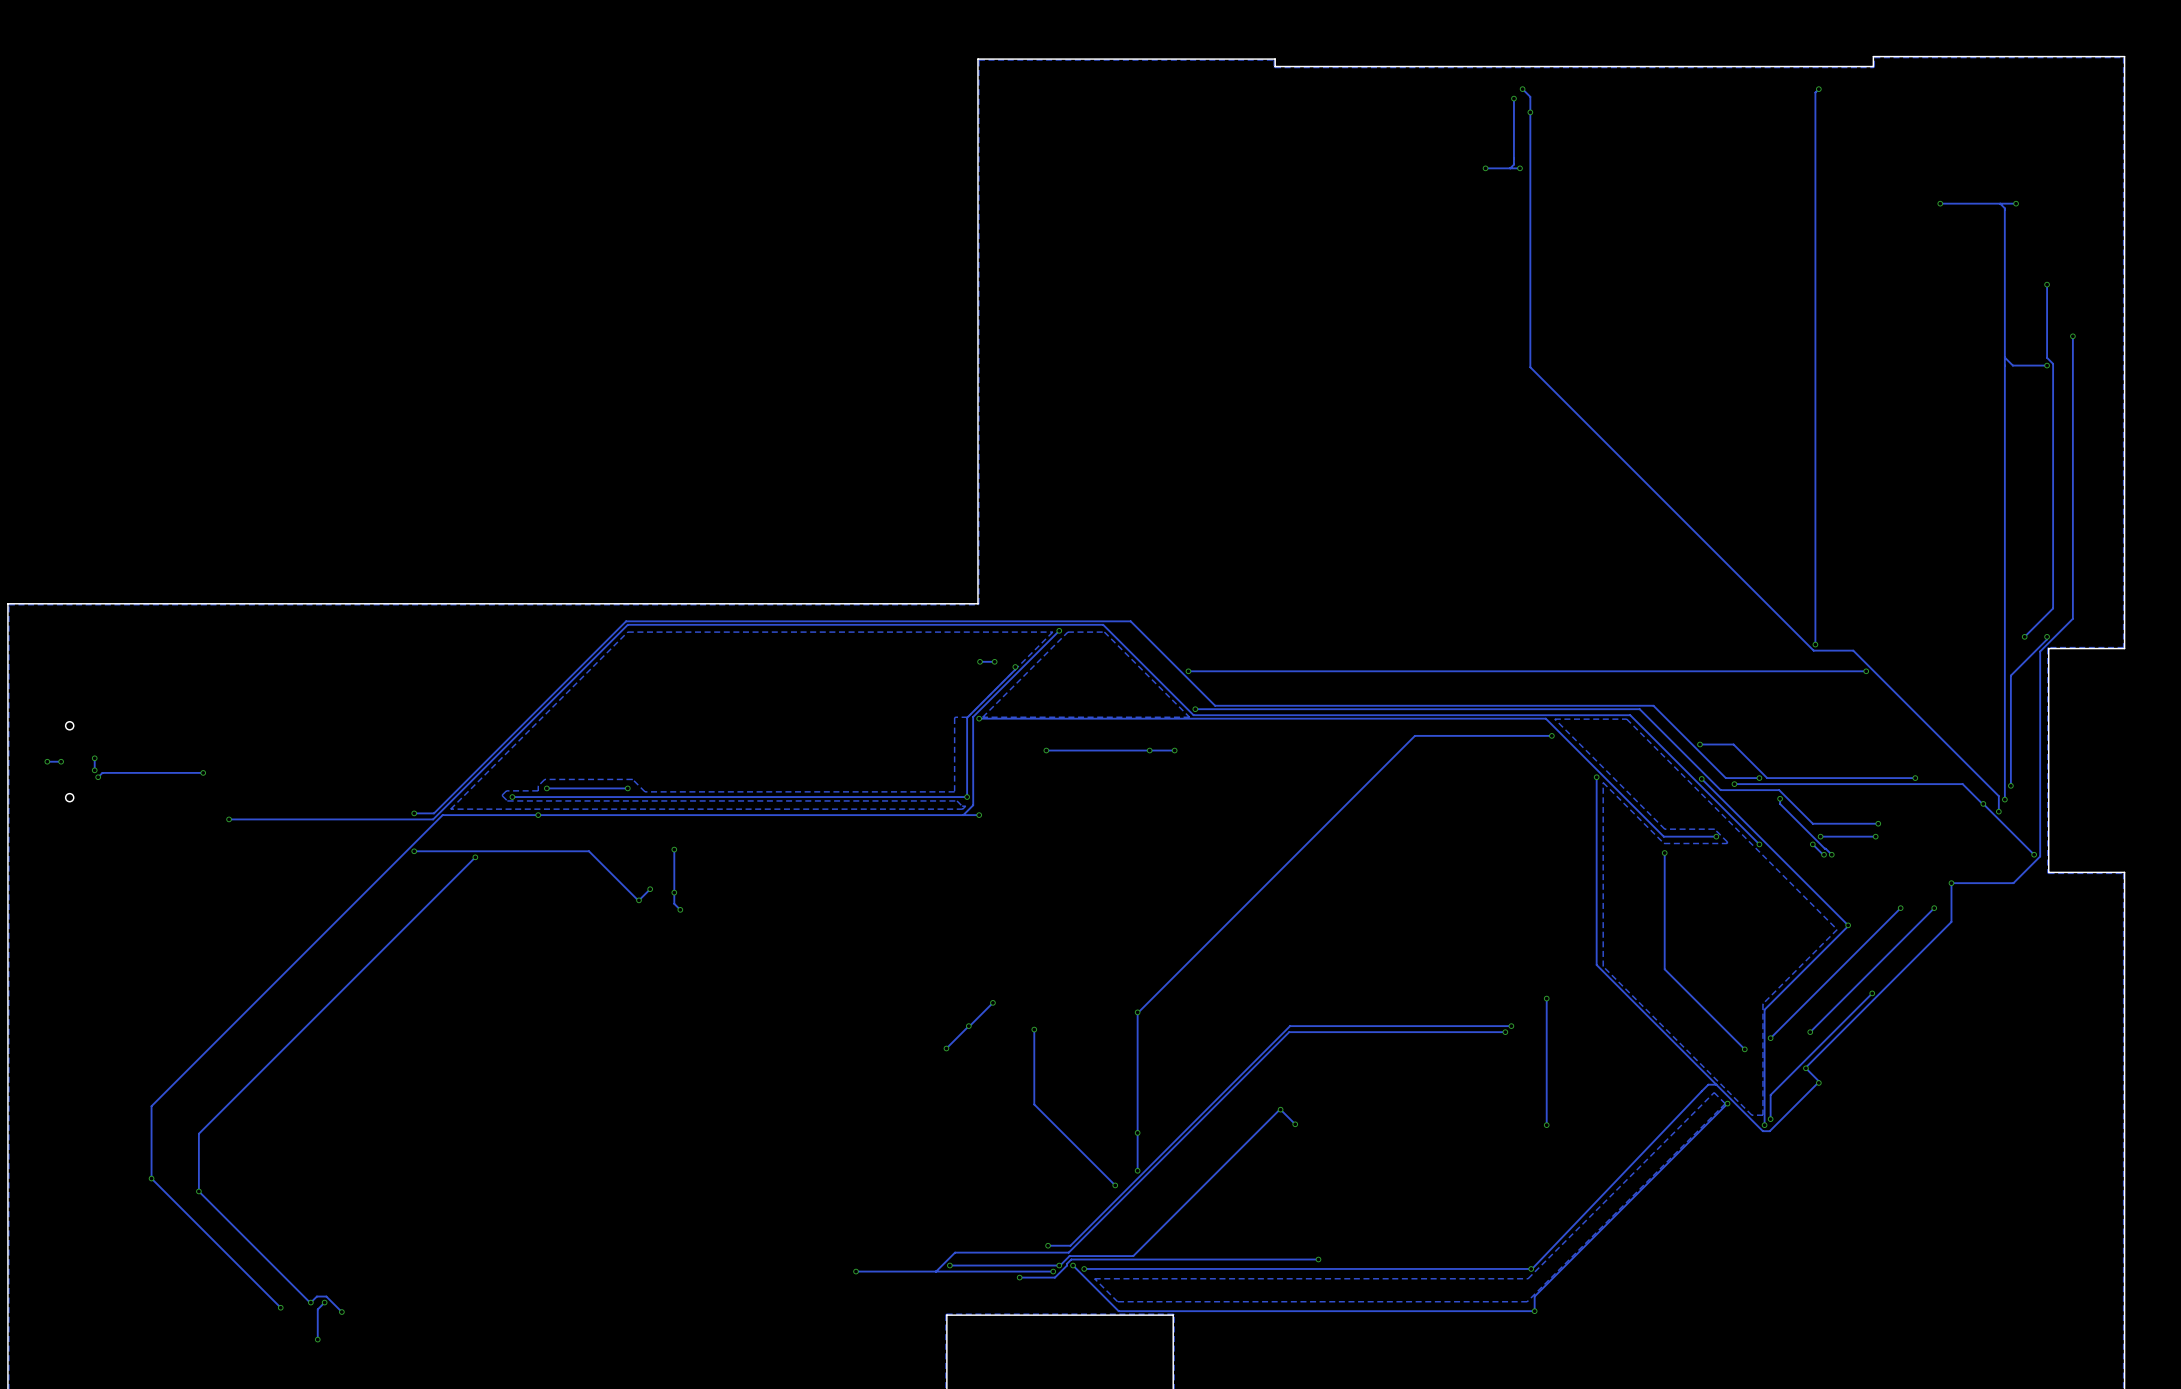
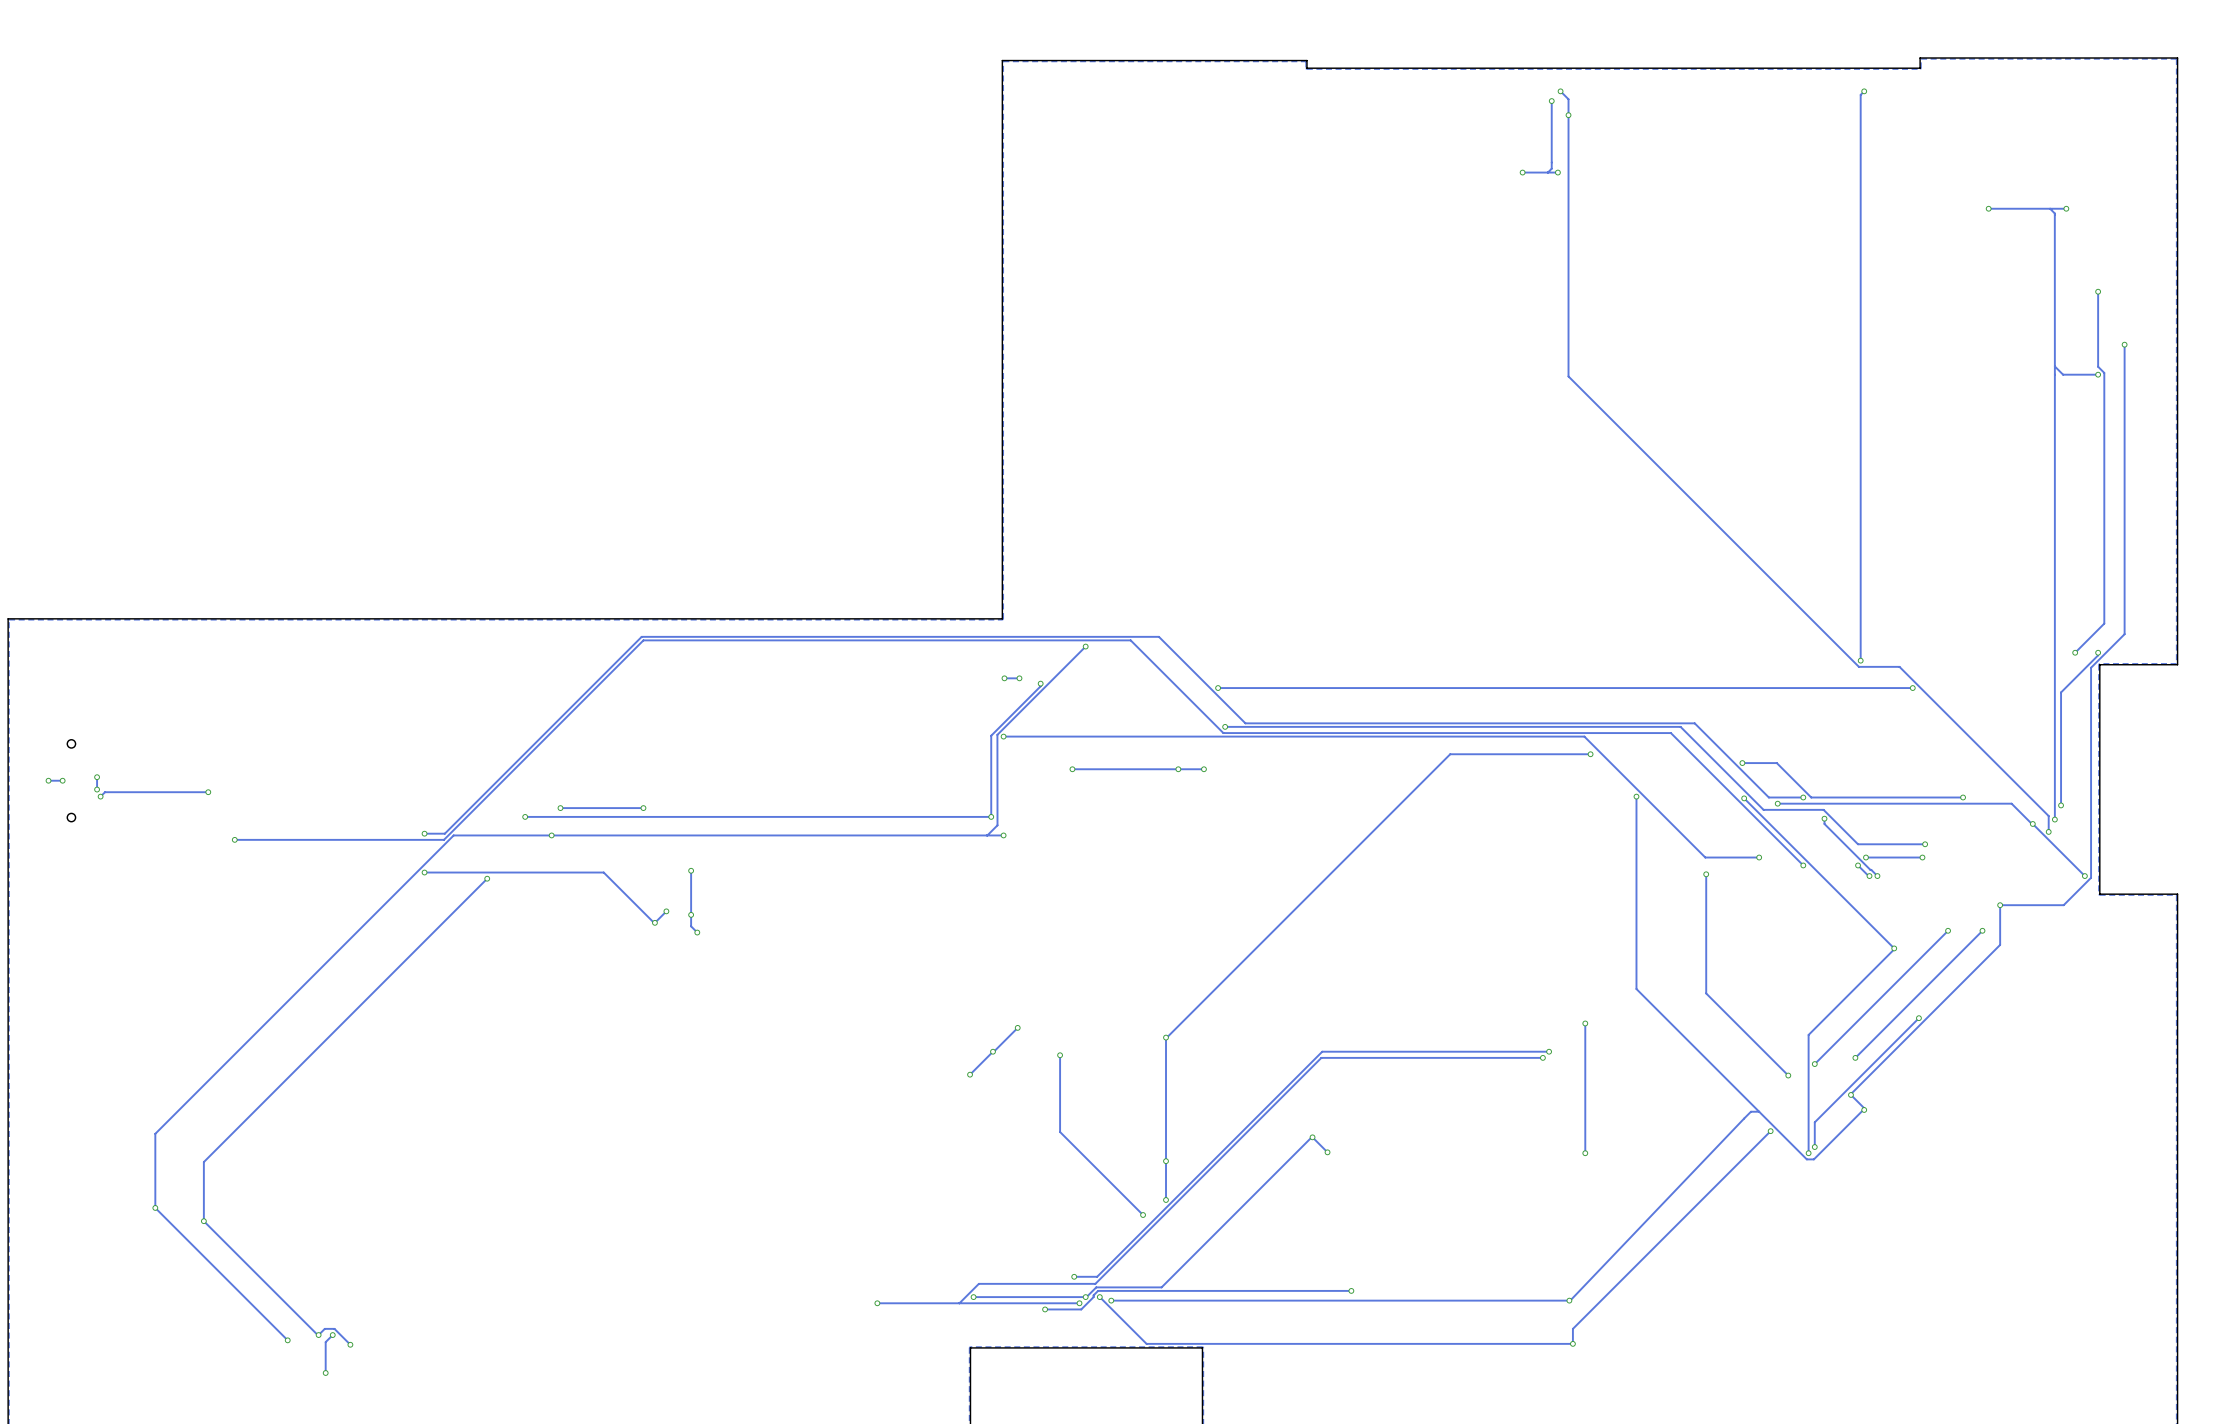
zone outline: (1052, 632) (627, 632) (450, 809) (962, 809) (965, 806) (962, 806) (957, 800) (507, 800) (502, 795) (506, 790) (538, 790) (538, 785) (544, 779) (632, 779) (645, 791) (954, 791) (954, 717) (967, 717) (1052, 632) -> none
zone outline: (1104, 632) (1067, 632) (982, 717) (1189, 717) (1104, 632) -> none
zone outline: (1626, 719) (1554, 719) (1664, 829) (1714, 829) (1727, 842) (1663, 843) (1603, 782) (1603, 966) (1751, 1115) (1762, 1115) (1762, 1004) (1837, 929) (1626, 719) -> none
zone outline: (1714, 1092) (1527, 1278) (1094, 1278) (1117, 1301) (1527, 1301) (1725, 1103) (1714, 1092) -> none

